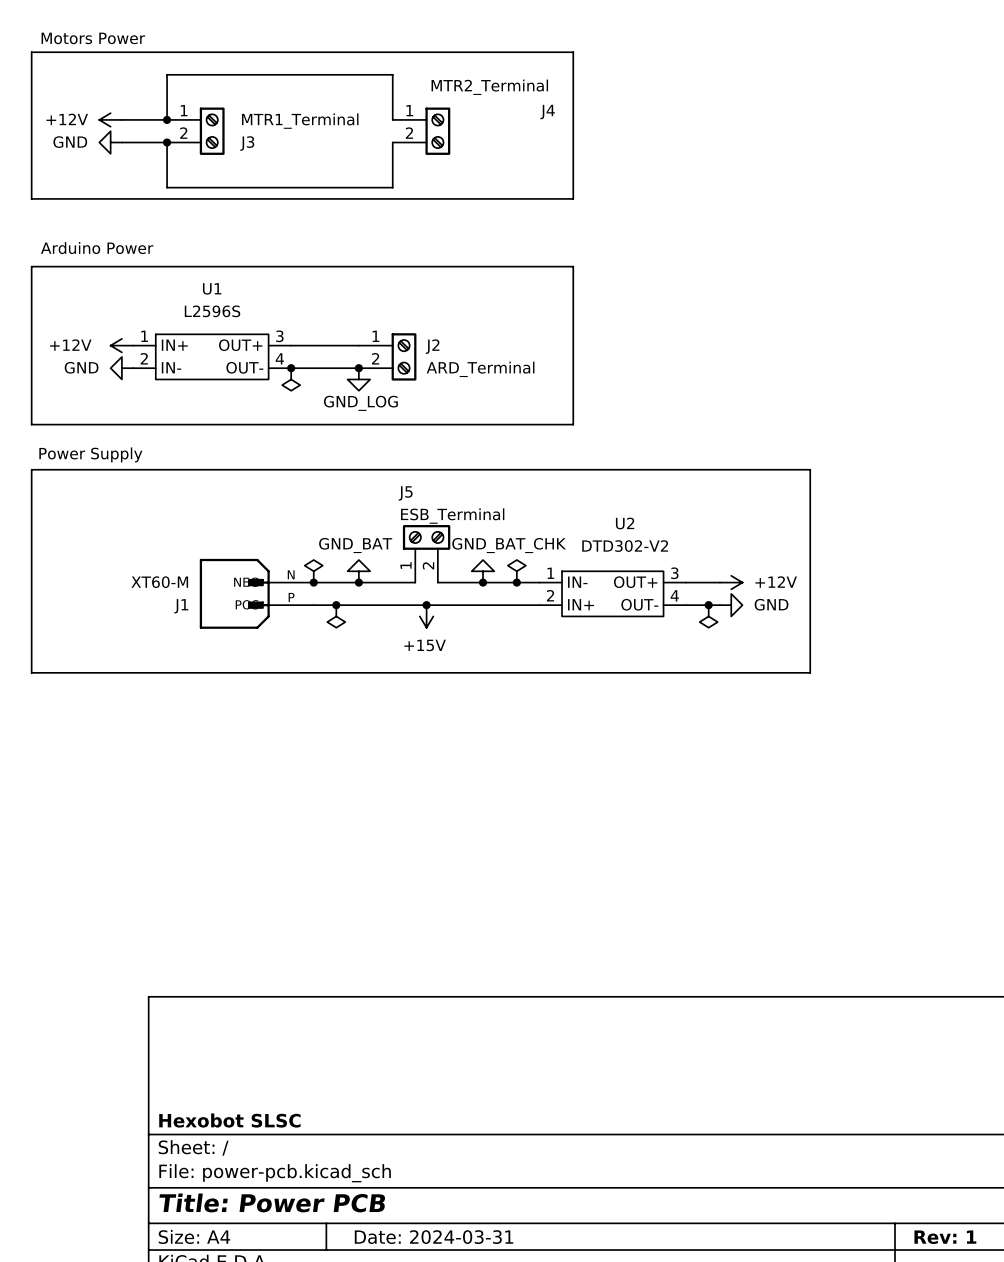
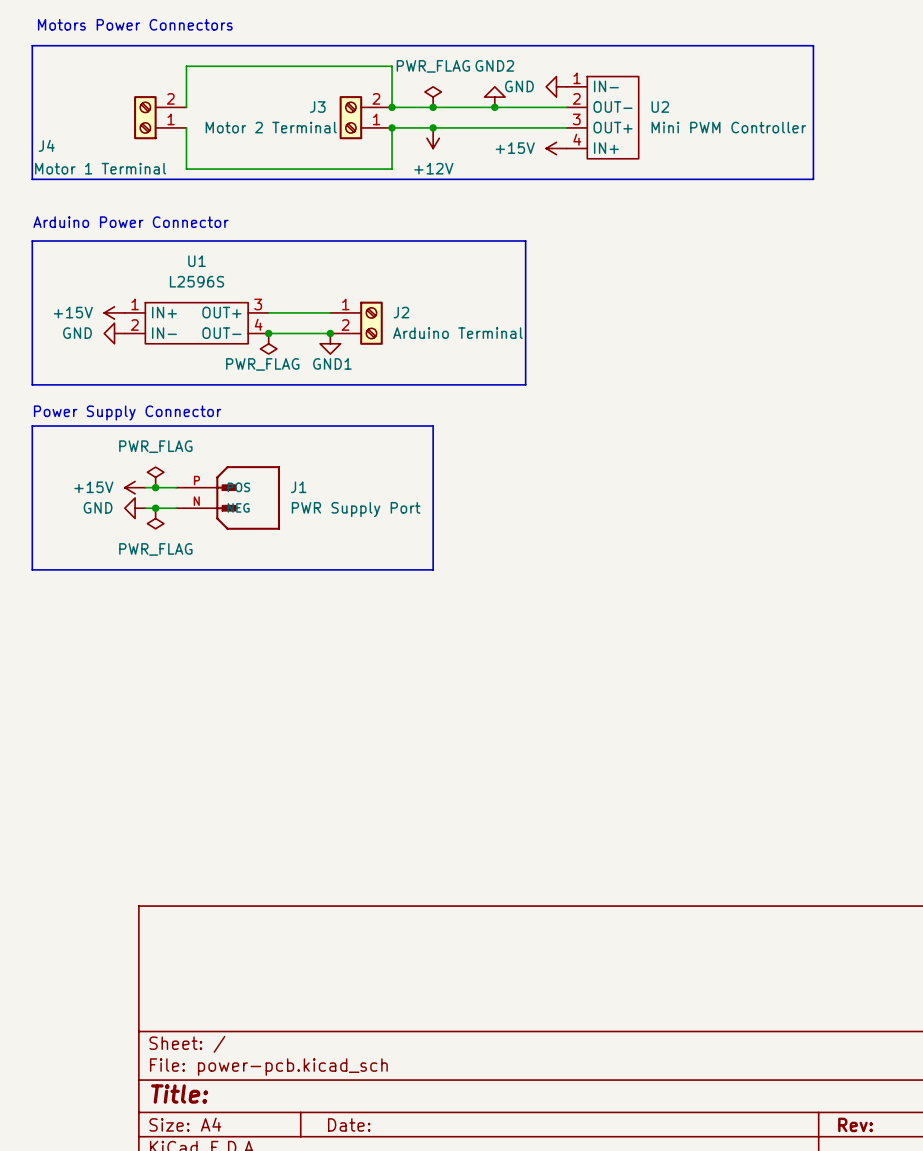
text: Motors Power (93, 38) -> Motors Power Connectors (135, 24)
line: (573, 52) (573, 198) -> (525, 45) (813, 45) (813, 179) (525, 179)
wire: (200, 74) (167, 74) (167, 119) (121, 119) -> (186, 66) (186, 107)
wire: (392, 74) (392, 119) -> (361, 66) (392, 66) (392, 107) (566, 107)
J4 value: MTR2_Terminal (489, 87) -> Motor 1 Terminal (100, 168)
power symbol: none -> GND (556, 86)
power symbol: none -> PWR_FLAG (433, 97)
power symbol: none -> GND2 (494, 97)
power symbol: +12V (110, 119) -> none
junction: (167, 119) -> none
junction: none -> (392, 107)
junction: none -> (433, 107)
junction: none -> (494, 107)
J3 value: MTR1_Terminal (300, 121) -> Motor 2 Terminal (271, 127)
J3 position: (195, 131) -> (365, 117)
J3 rotation: 0° (212, 131) -> 180° (350, 117)
J4 position: (421, 131) -> (160, 117)
J4 rotation: 0° (437, 131) -> 180° (145, 117)
power symbol: GND (110, 142) -> none
wire: (121, 142) (167, 142) (167, 187) (200, 187) -> (186, 127) (186, 169)
junction: (167, 142) -> none
wire: (392, 142) (392, 187) -> (566, 127) (392, 127) (392, 169) (361, 169)
junction: none -> (392, 127)
junction: none -> (433, 127)
power symbol: none -> +12V (433, 138)
power symbol: none -> +15V (556, 148)
text: Arduino Power (97, 248) -> Arduino Power Connector (130, 222)
power symbol: +12V (121, 345) -> +15V (114, 312)
J2 value: ARD_Terminal (480, 369) -> Arduino Terminal (457, 333)
power symbol: GND_LOG (358, 379) -> GND1 (330, 343)
power symbol text: none -> PWR_FLAG (262, 364)
text: Power Supply (90, 454) -> Power Supply Connector (127, 412)
line: (471, 469) (810, 469) (810, 672) (31, 672) (31, 627) -> (433, 426) (433, 569) (32, 569)
U2 name position: U2 (625, 523) -> U2 (660, 107)
power symbol: none -> PWR_FLAG (155, 477)
power symbol: none -> +15V (135, 487)
wire: none -> (145, 487) (176, 487)
junction: none -> (155, 487)
U2 value: DTD302-V2 (625, 546) -> Mini PWM Controller (728, 127)
J5: ESB_Terminal (426, 553) -> none
power symbol: none -> GND (135, 508)
wire: none -> (145, 508) (176, 508)
junction: none -> (155, 508)
power symbol: none -> PWR_FLAG (155, 518)
power symbol: (313, 571) -> none
power symbol: GND_BAT (358, 571) -> none
power symbol: GND_BAT_CHK (483, 571) -> none
power symbol: (516, 571) -> none
U2 symbol: [539, 571, 687, 617] -> [566, 76, 639, 159]
J1 value: XT60-M (159, 582) -> PWR Supply Port (356, 509)
wire: (313, 582) (415, 582) -> none
junction: (313, 582) -> none
junction: (358, 582) -> none
wire: (437, 582) (539, 582) -> none
junction: (483, 582) -> none
junction: (516, 582) -> none
wire: (686, 582) (719, 582) -> none
power symbol: +12V (731, 582) -> none
J1 rotation: 0° (234, 593) -> 180° (248, 497)
wire: (313, 605) (539, 605) -> none
junction: (336, 605) -> none
junction: (426, 605) -> none
wire: (686, 605) (719, 605) -> none
junction: (708, 605) -> none
power symbol: GND (731, 605) -> none
power symbol: (336, 616) -> none
power symbol: +15V (426, 616) -> none
power symbol: (708, 616) -> none
title block: Hexobot SLSC (229, 1120) -> none
title block: Title: Power PCB (272, 1202) -> Title: (179, 1094)
title block: Date: 2024-03-31 (434, 1237) -> Date: (349, 1124)
title block: Rev: 1 (945, 1237) -> Rev: (855, 1124)

